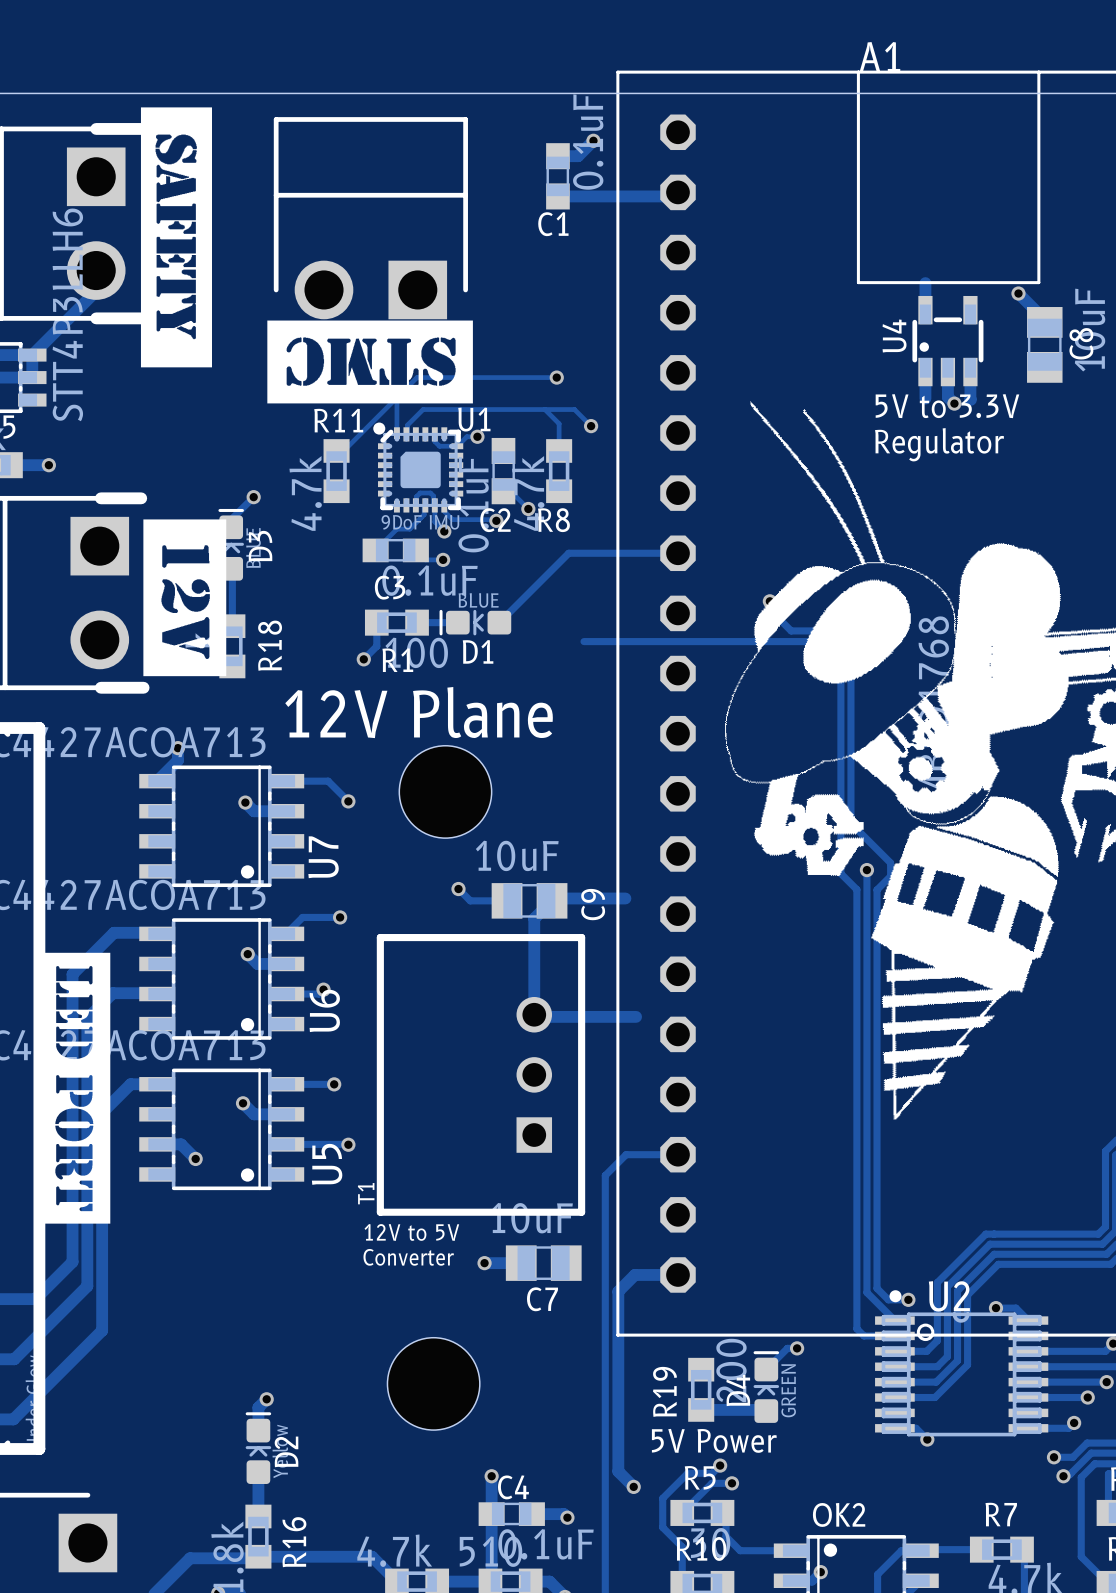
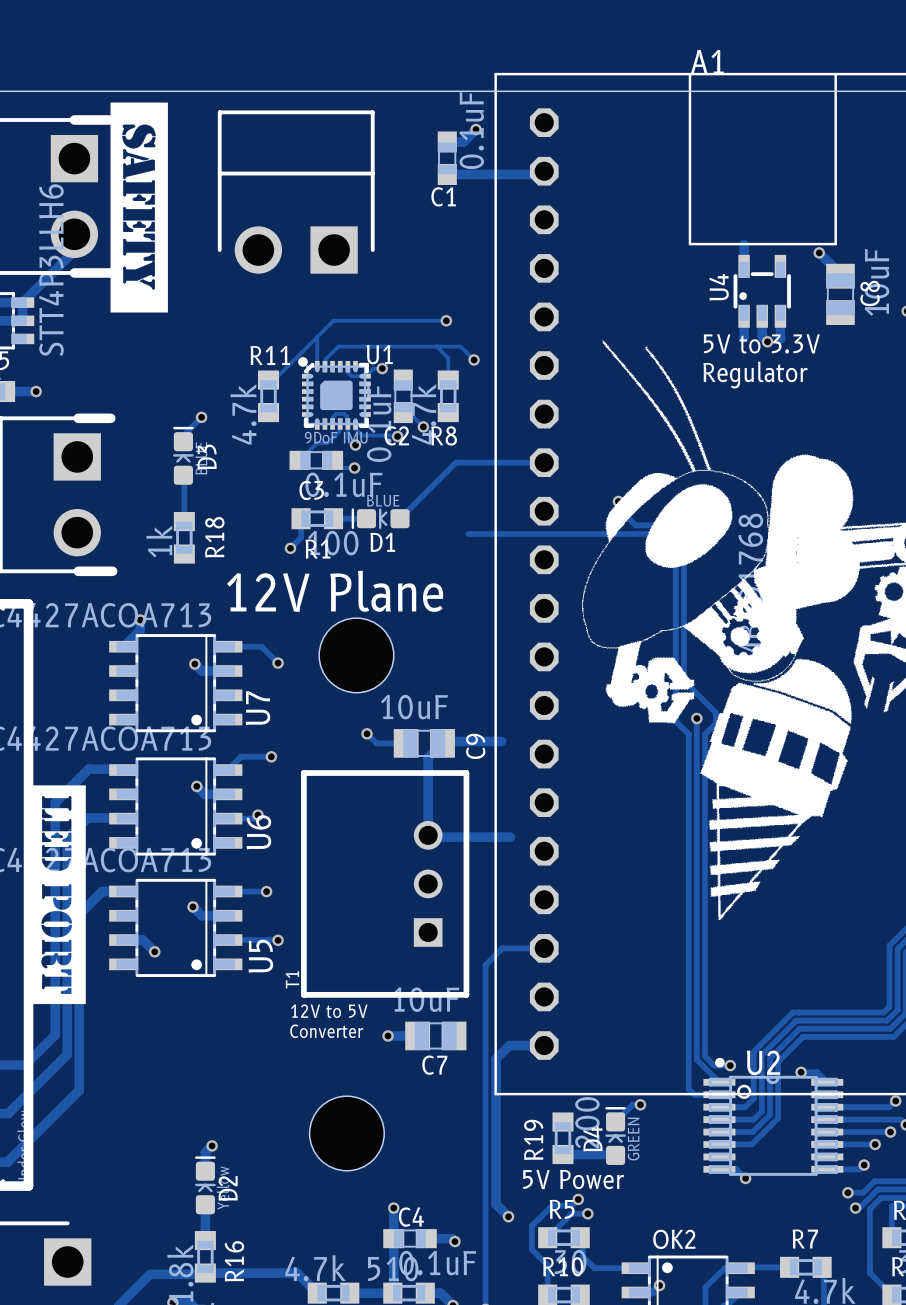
drawing: [267, 320, 473, 404] -> none
drawing: [143, 519, 227, 677] -> none

